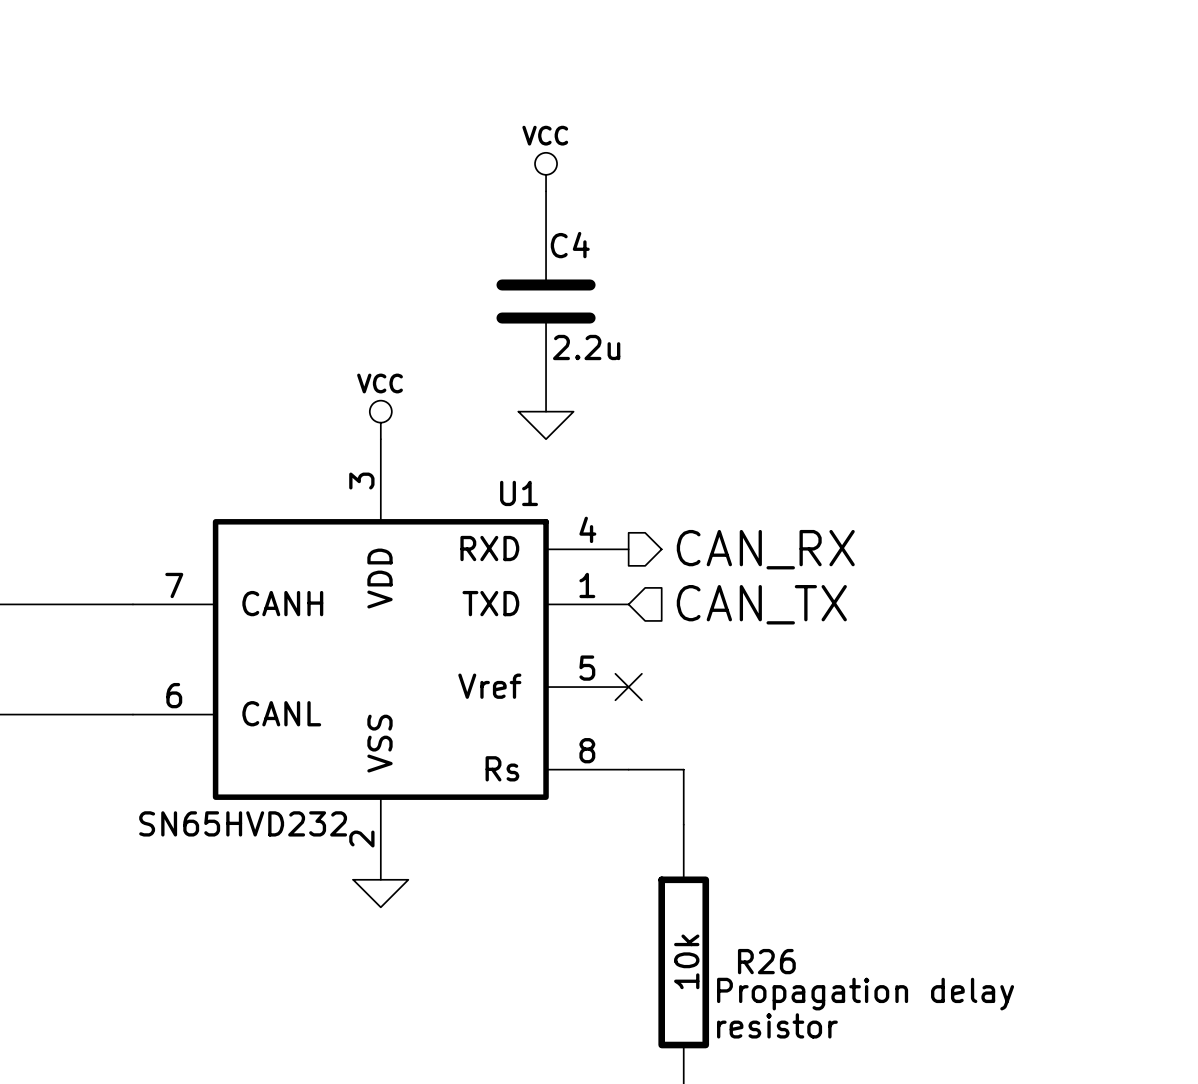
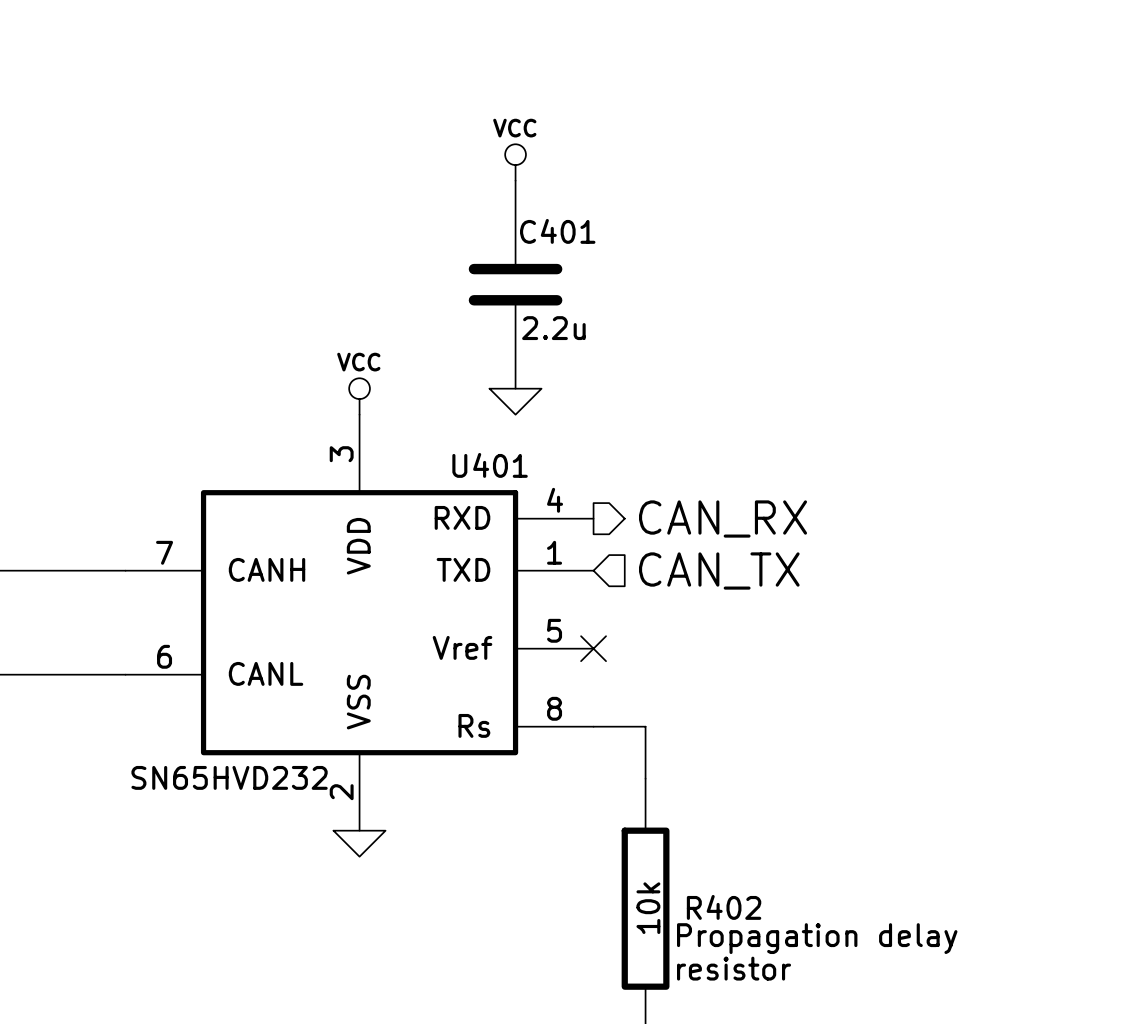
C4 name: C4 (570, 245) -> C401 (557, 231)
U1 name: U1 (519, 493) -> U401 (490, 465)
R26 name: R26 (766, 961) -> R402 (724, 907)

